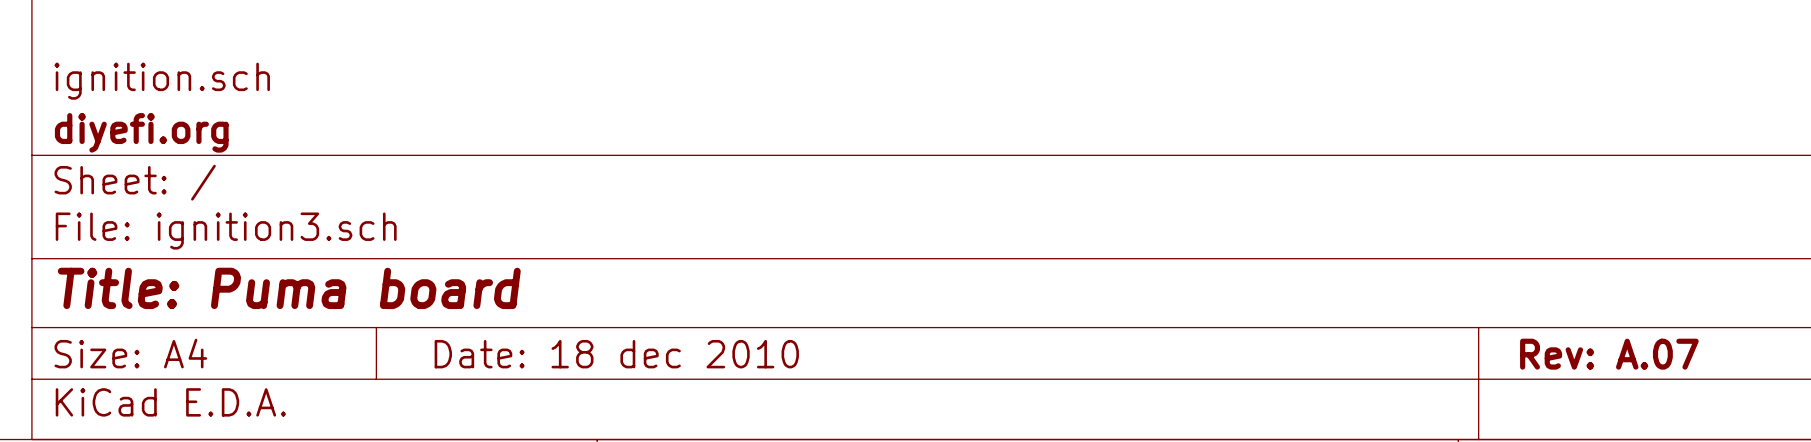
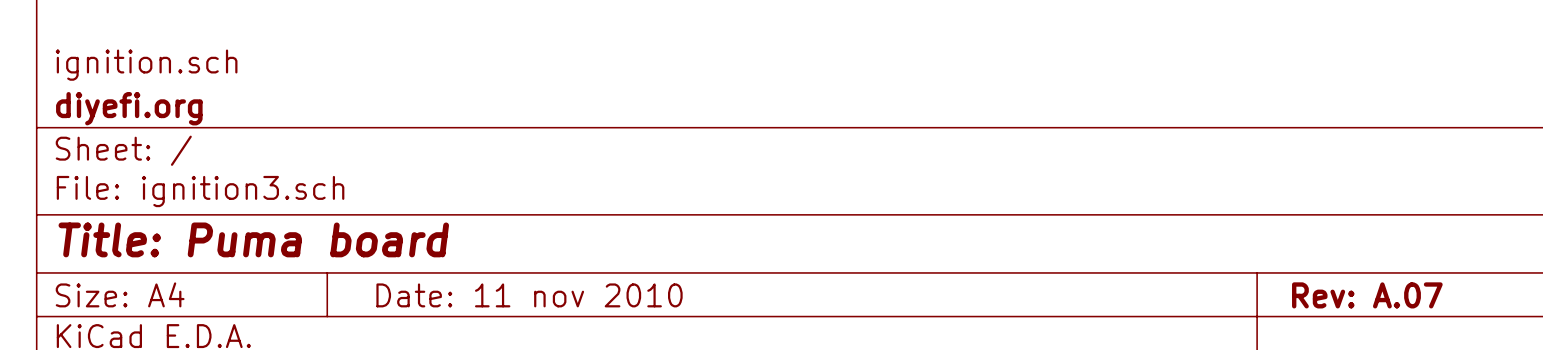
title block: Date: 18 dec 2010 (616, 354) -> Date: 11 nov 2010 (529, 295)

